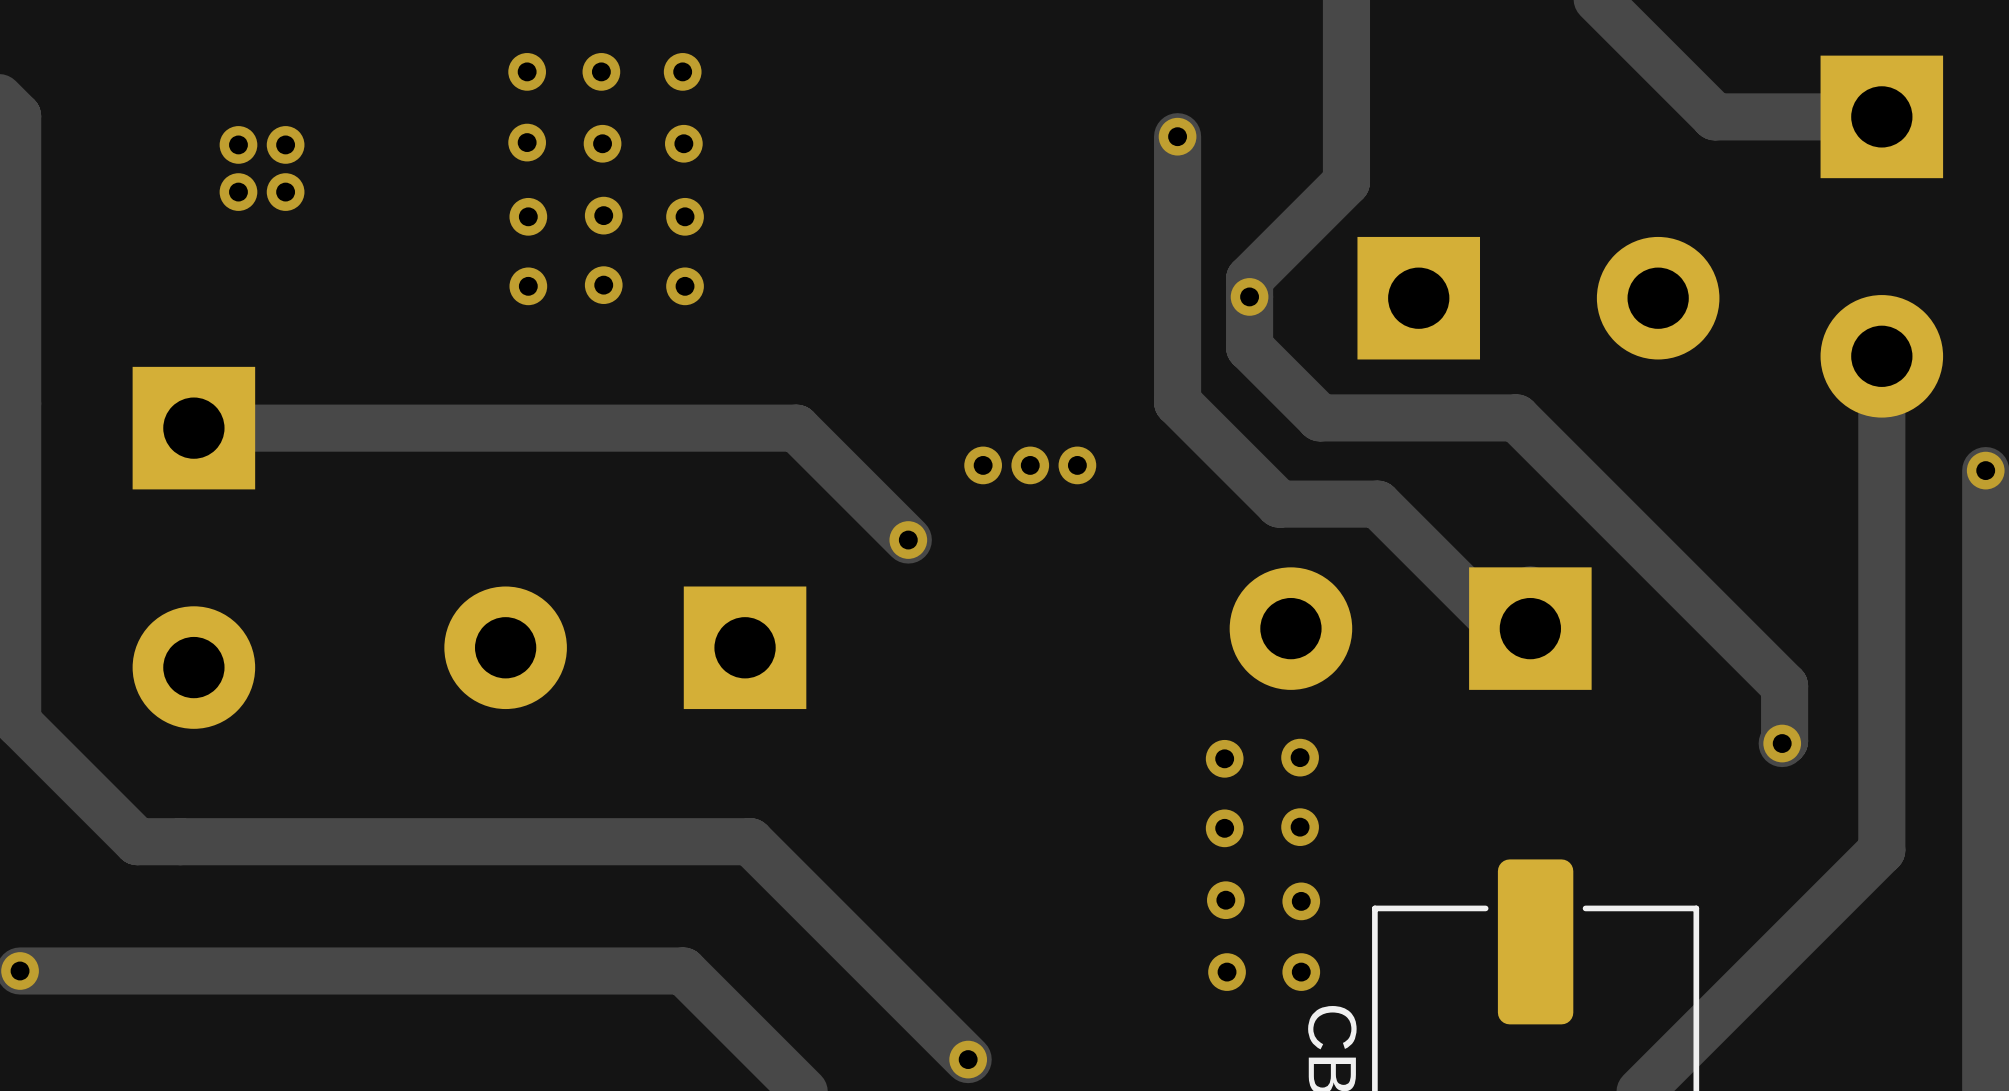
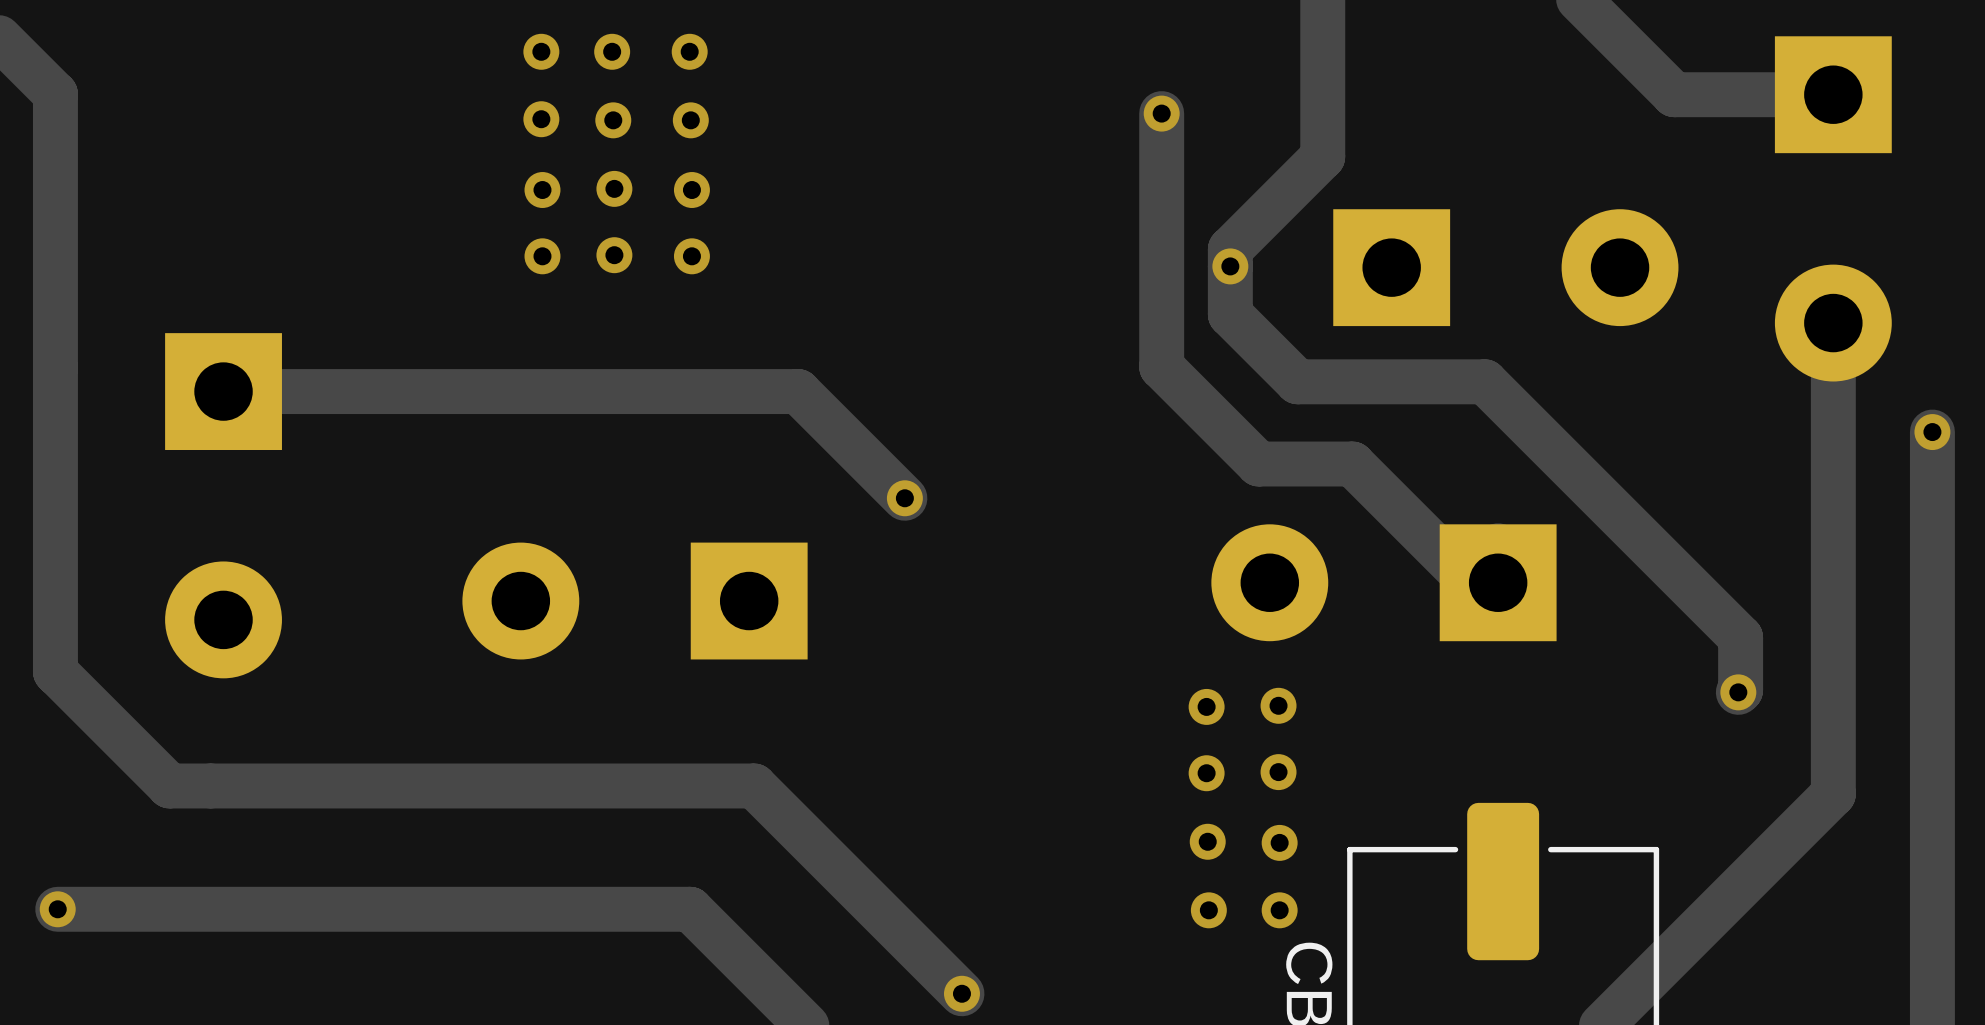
via: (238, 144) -> none
via: (285, 144) -> none
via: (238, 192) -> none
via: (285, 192) -> none
via: (983, 465) -> none
via: (1030, 465) -> none
via: (1077, 465) -> none

